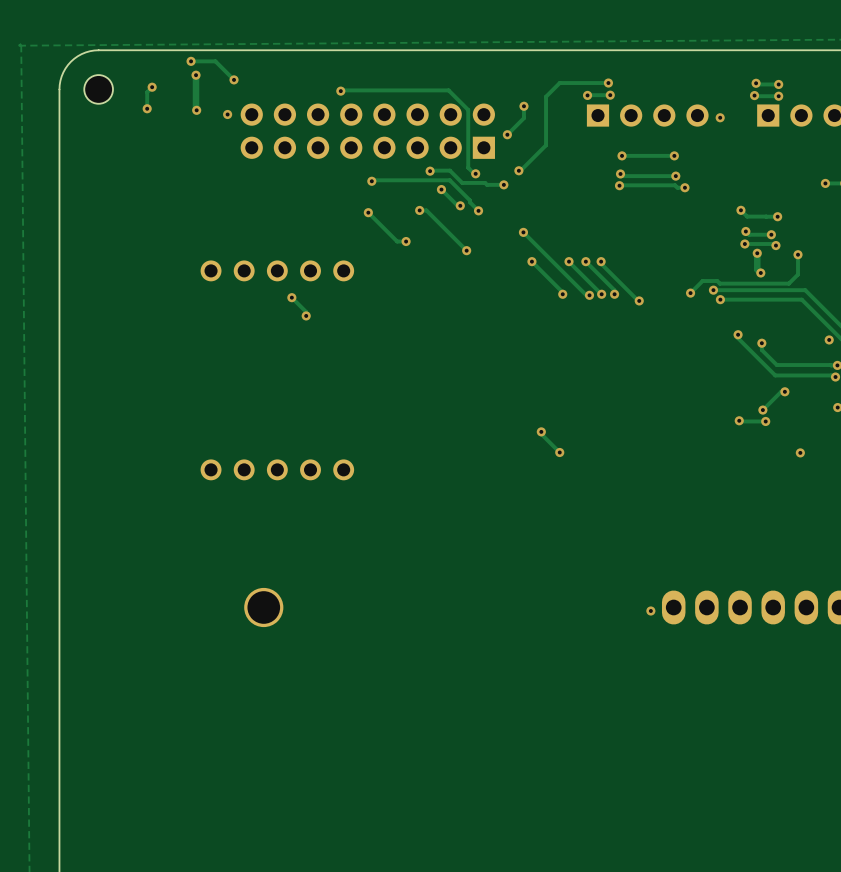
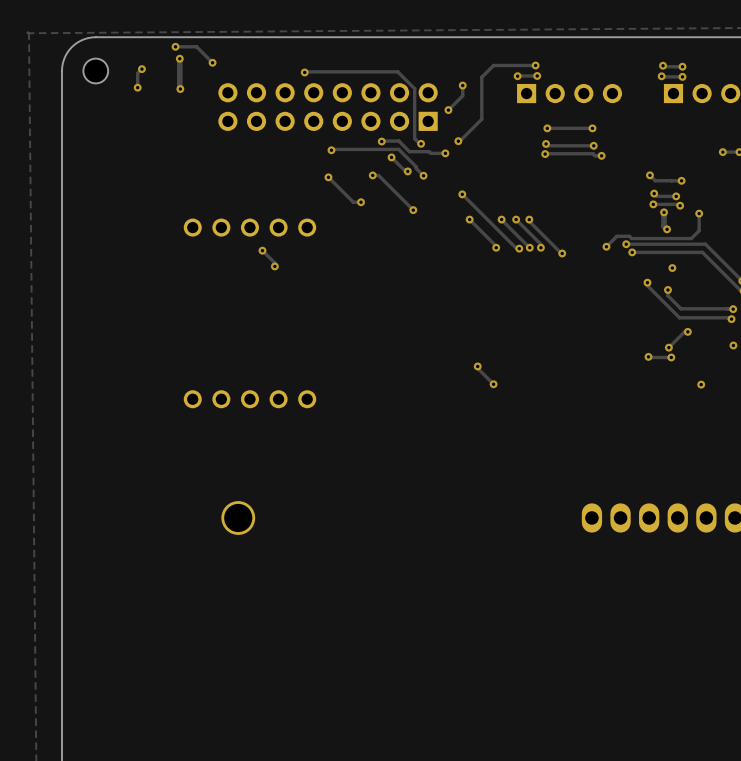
via: (227, 114) -> none
via: (720, 117) -> none
via position: (829, 339) -> (672, 268)
via: (650, 610) -> none

